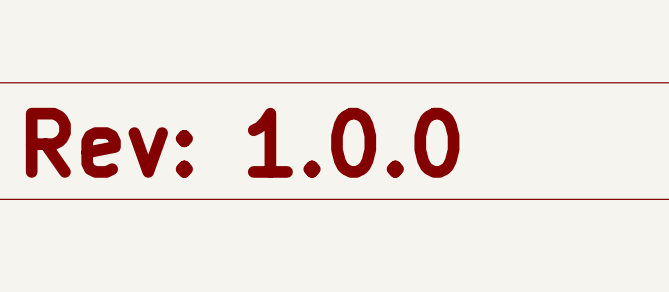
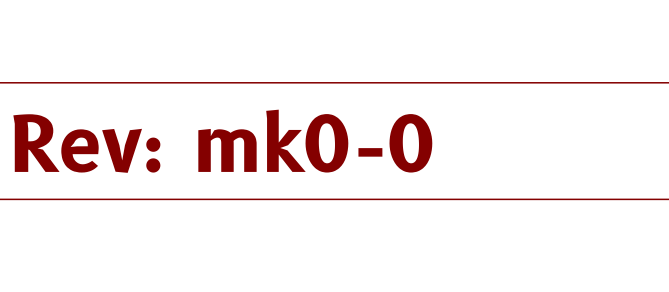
title block: Rev: 1.0.0 (242, 142) -> Rev: mk0-0 (222, 141)

